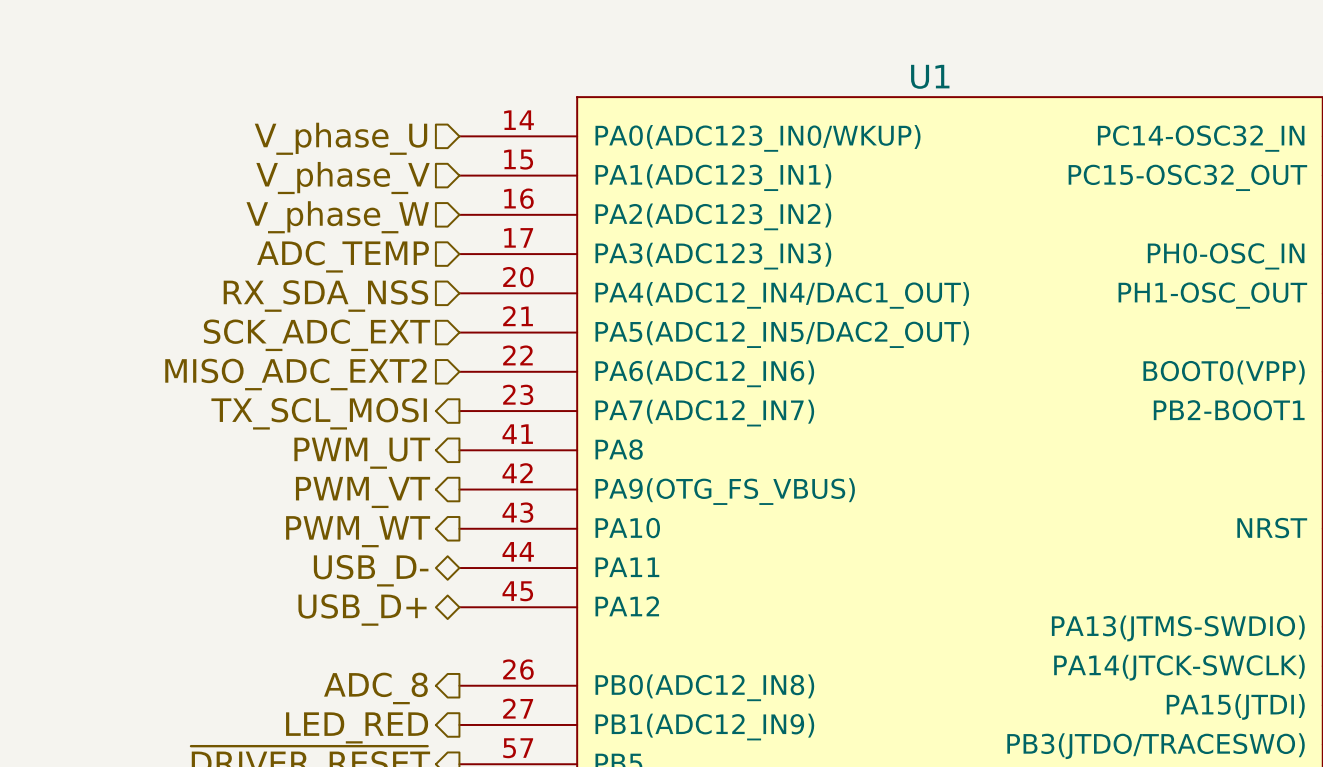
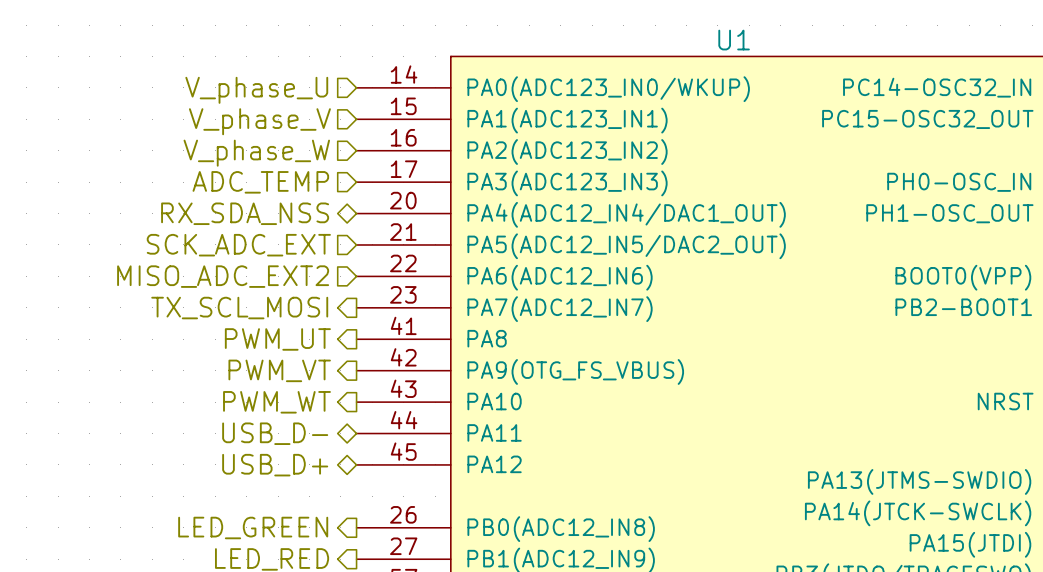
hierarchical label shape: input (325, 296) -> bidirectional (245, 213)
hierarchical label: ADC_8 (375, 688) -> LED_GREEN (253, 527)

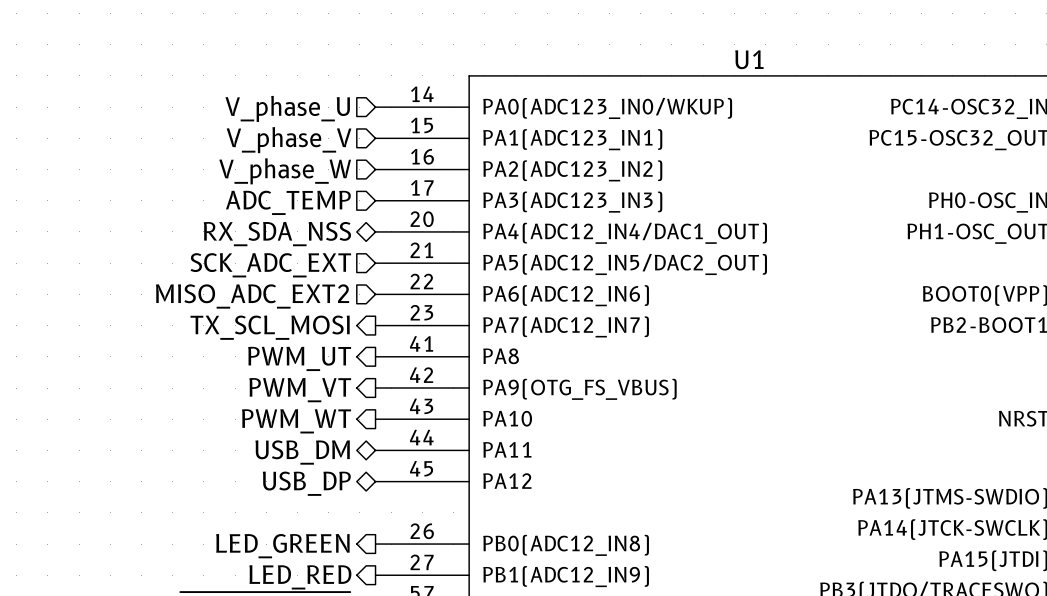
hierarchical label: USB_D- (275, 433) -> USB_DM (302, 452)
hierarchical label: USB_D+ (275, 465) -> USB_DP (306, 483)

